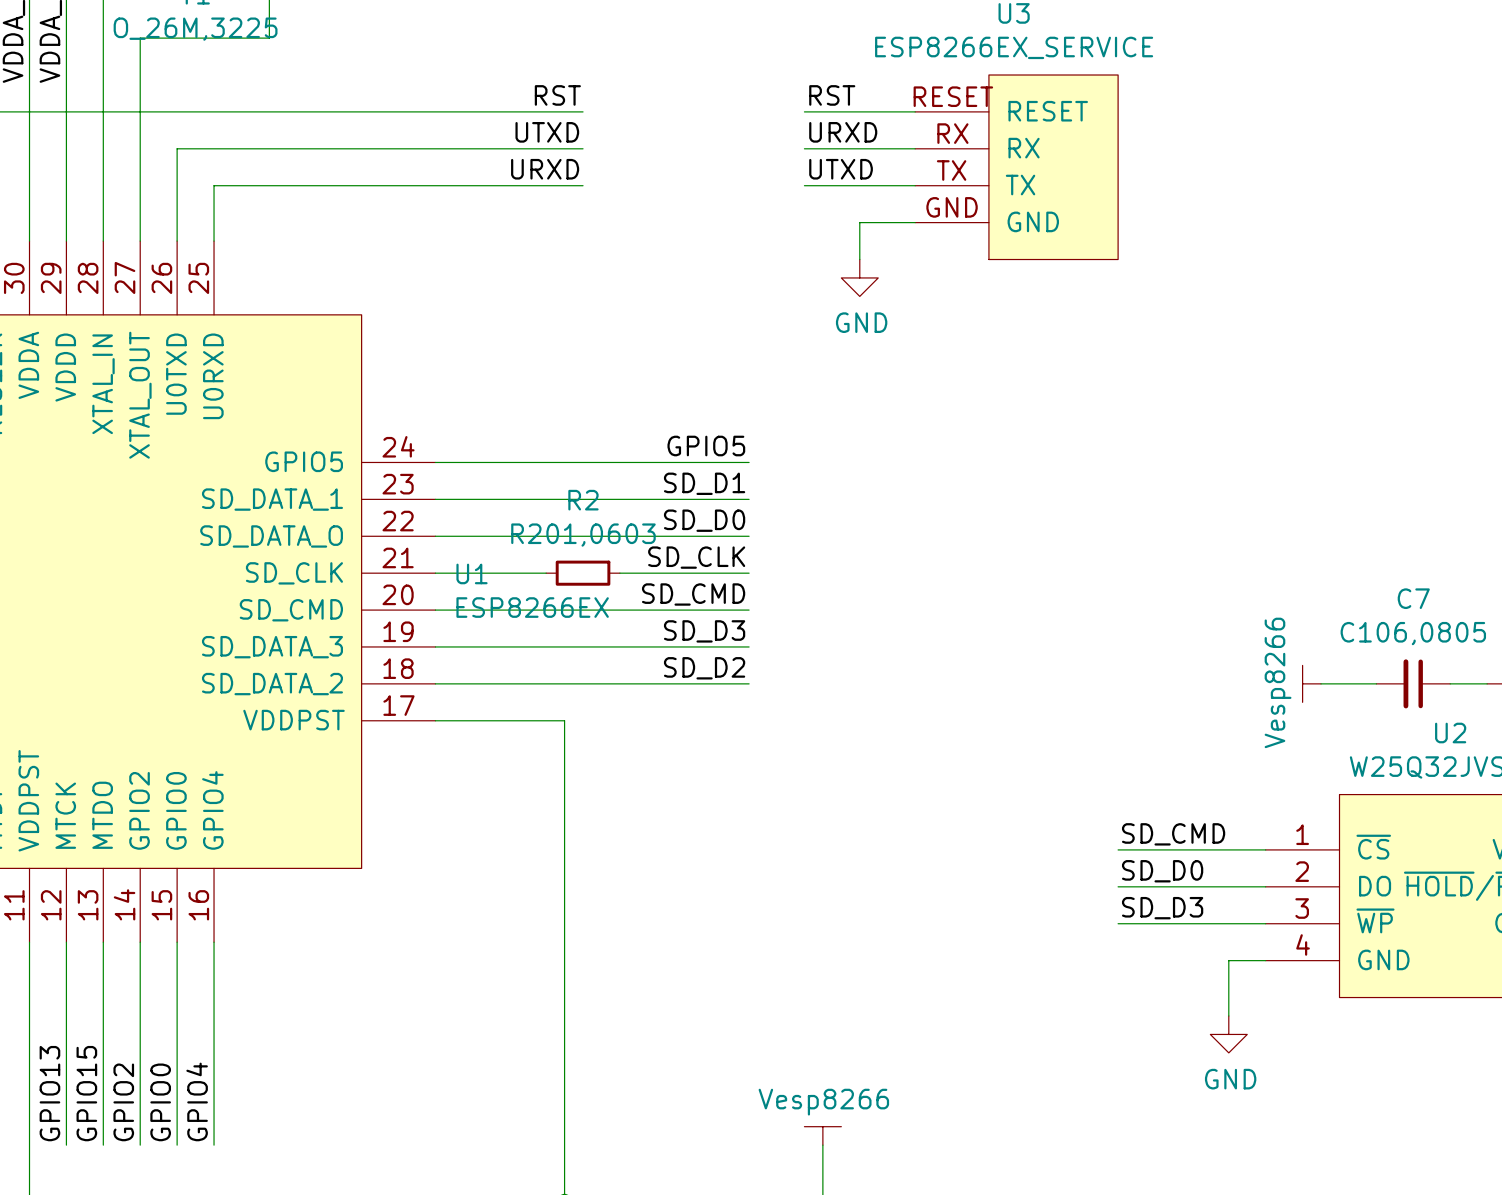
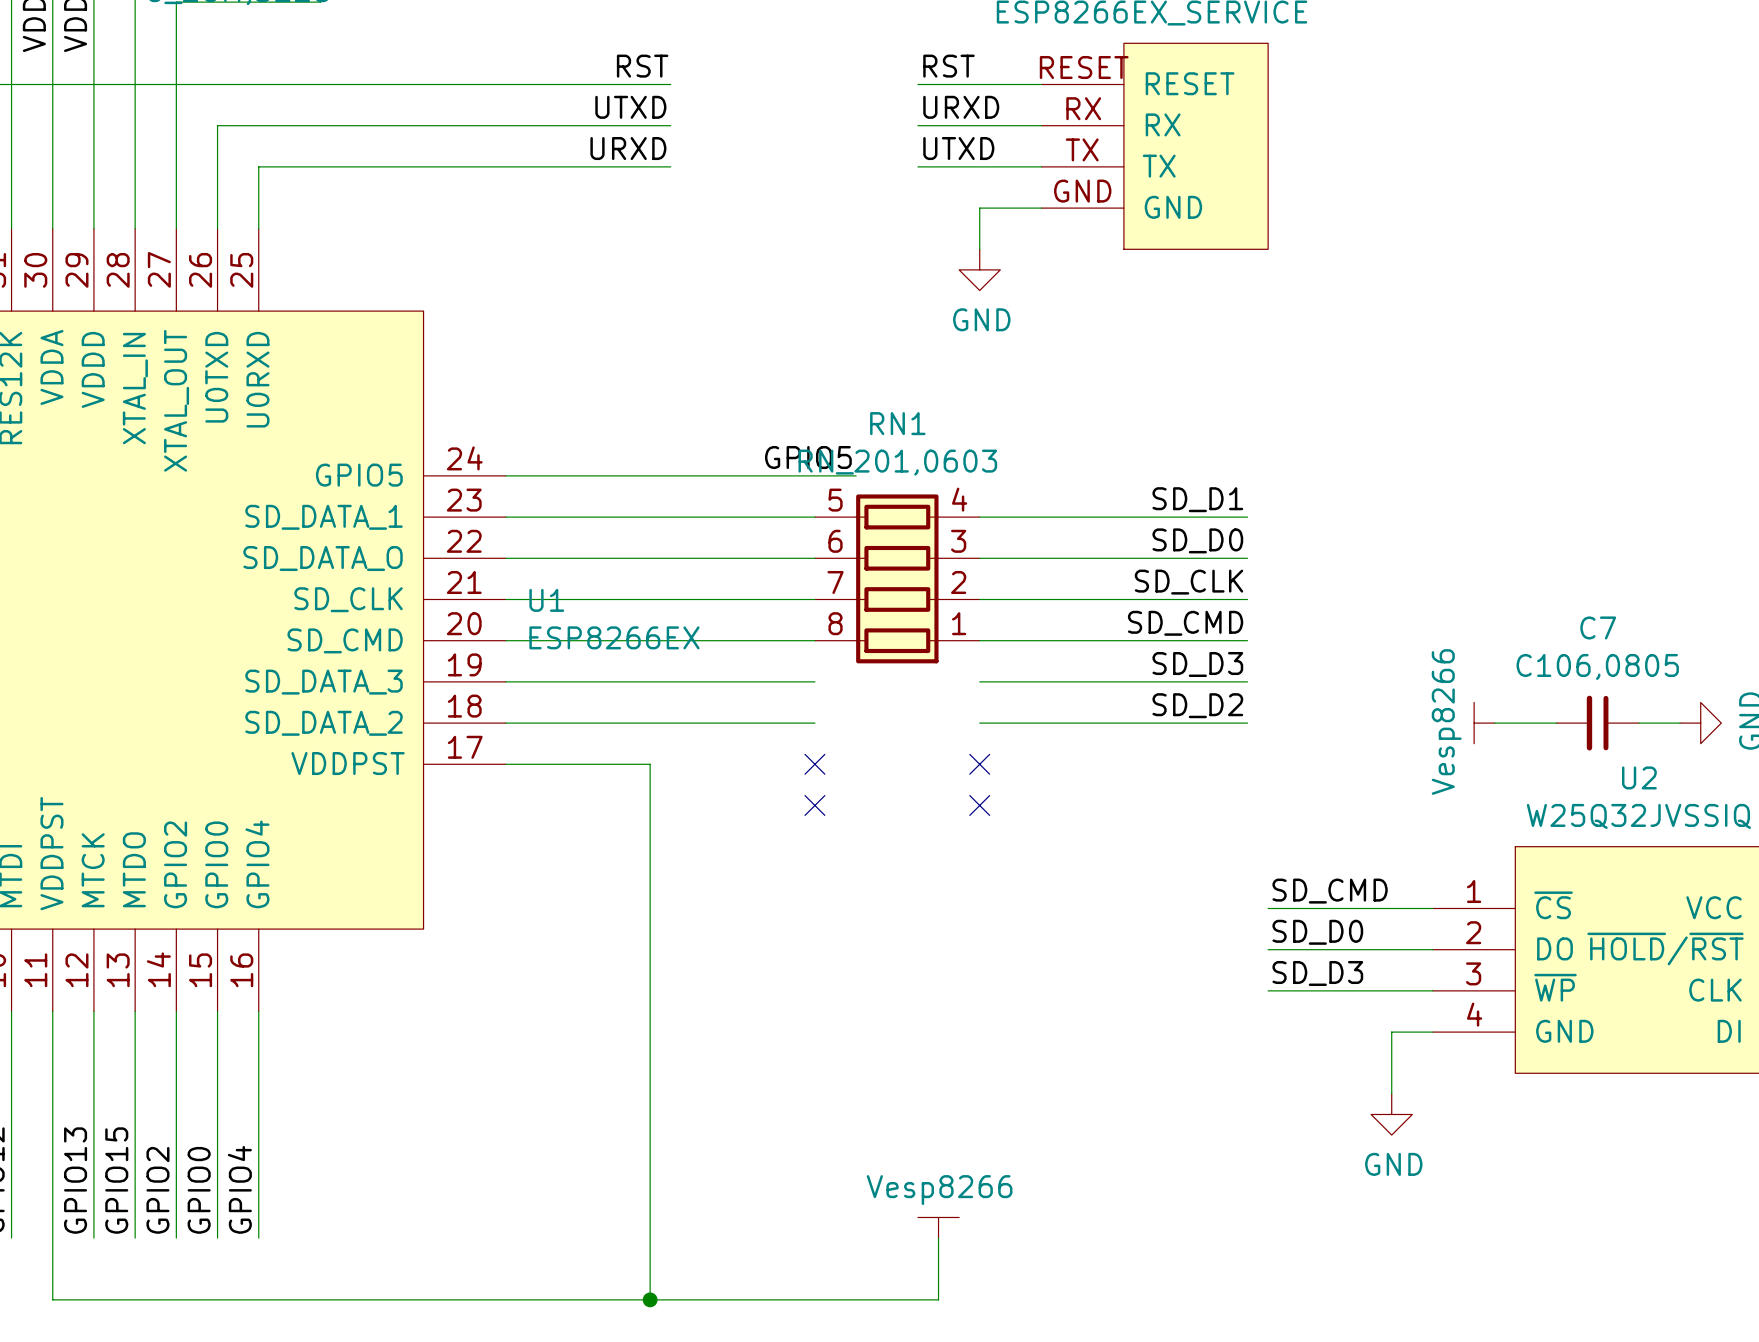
label position: SD_D1 (704, 483) -> SD_D1 (1197, 499)
wire: none -> (979, 517) (1247, 517)
label position: SD_D0 (704, 520) -> SD_D0 (1197, 540)
wire: none -> (979, 558) (1247, 558)
RN1: none -> RN_201,0603 (897, 578)
label position: SD_CLK (696, 557) -> SD_CLK (1189, 582)
wire: none -> (629, 599) (711, 599)
R2: R201,0603 (583, 573) -> none
wire: none -> (979, 599) (1247, 599)
label position: SD_CMD (693, 594) -> SD_CMD (1185, 623)
wire: none -> (979, 640) (1247, 640)
label position: SD_D3 (704, 631) -> SD_D3 (1197, 664)
wire: (712, 646) (749, 646) -> none
wire: none -> (979, 681) (1247, 681)
label position: SD_D2 (704, 668) -> SD_D2 (1197, 705)
wire: (712, 683) (749, 683) -> none
wire: none -> (979, 723) (1247, 723)
no-connect mark: none -> (814, 764)
no-connect mark: none -> (979, 764)
no-connect mark: none -> (814, 805)
no-connect mark: none -> (979, 805)

